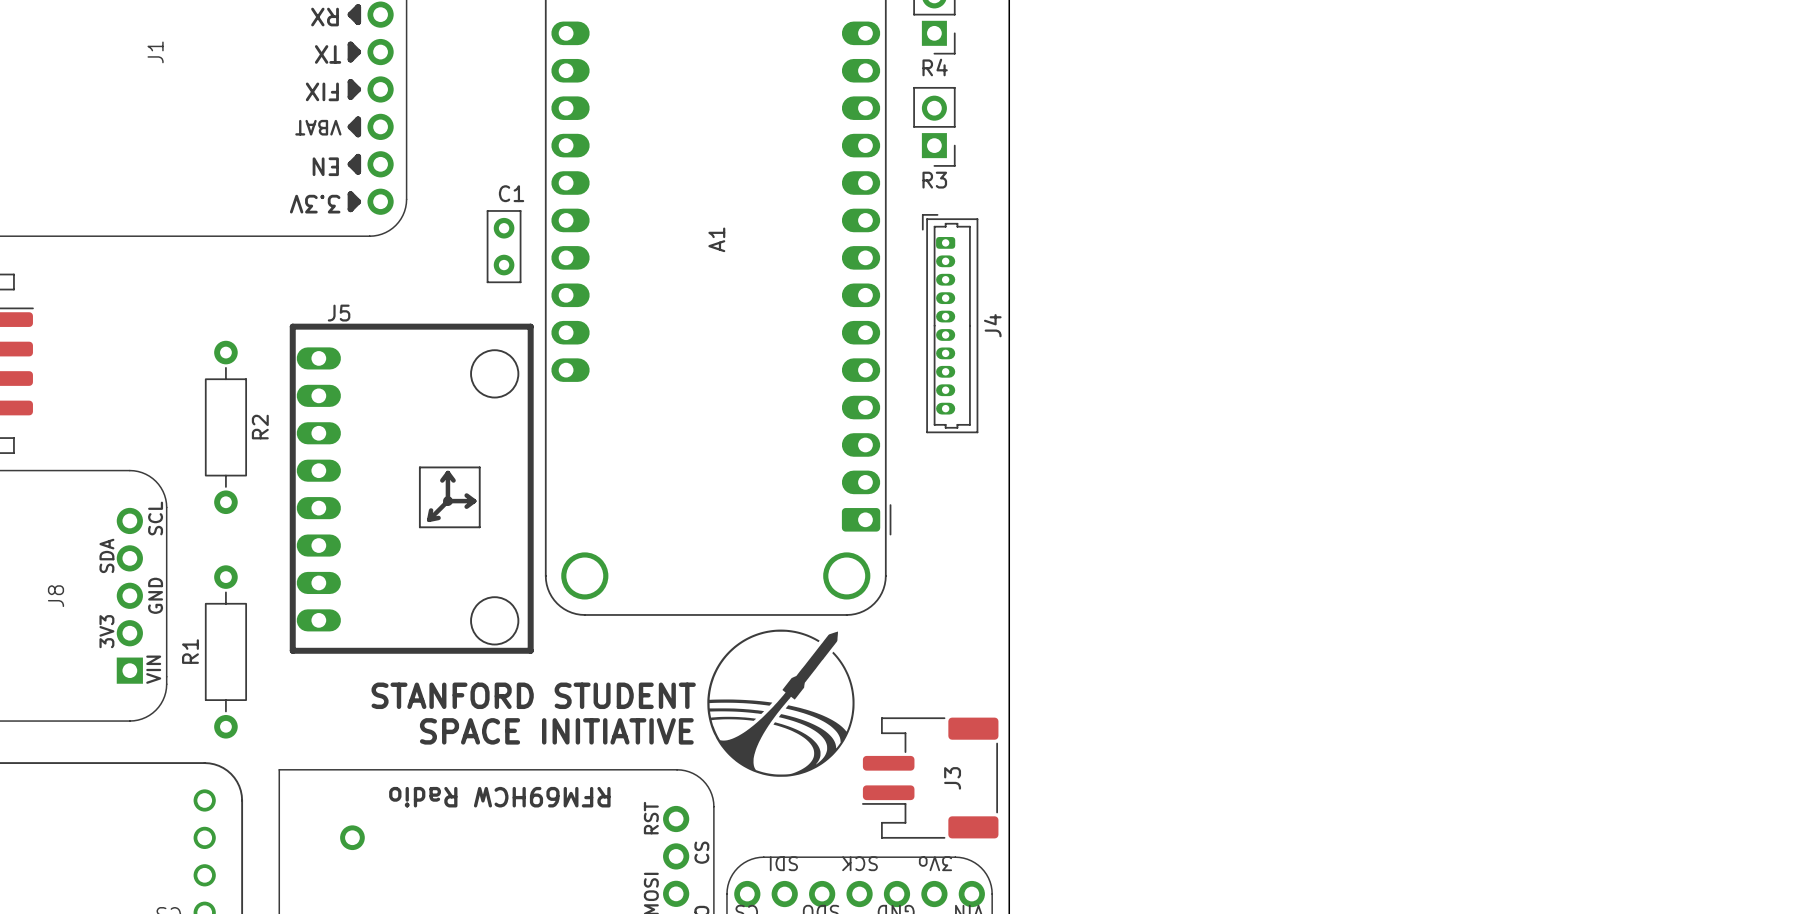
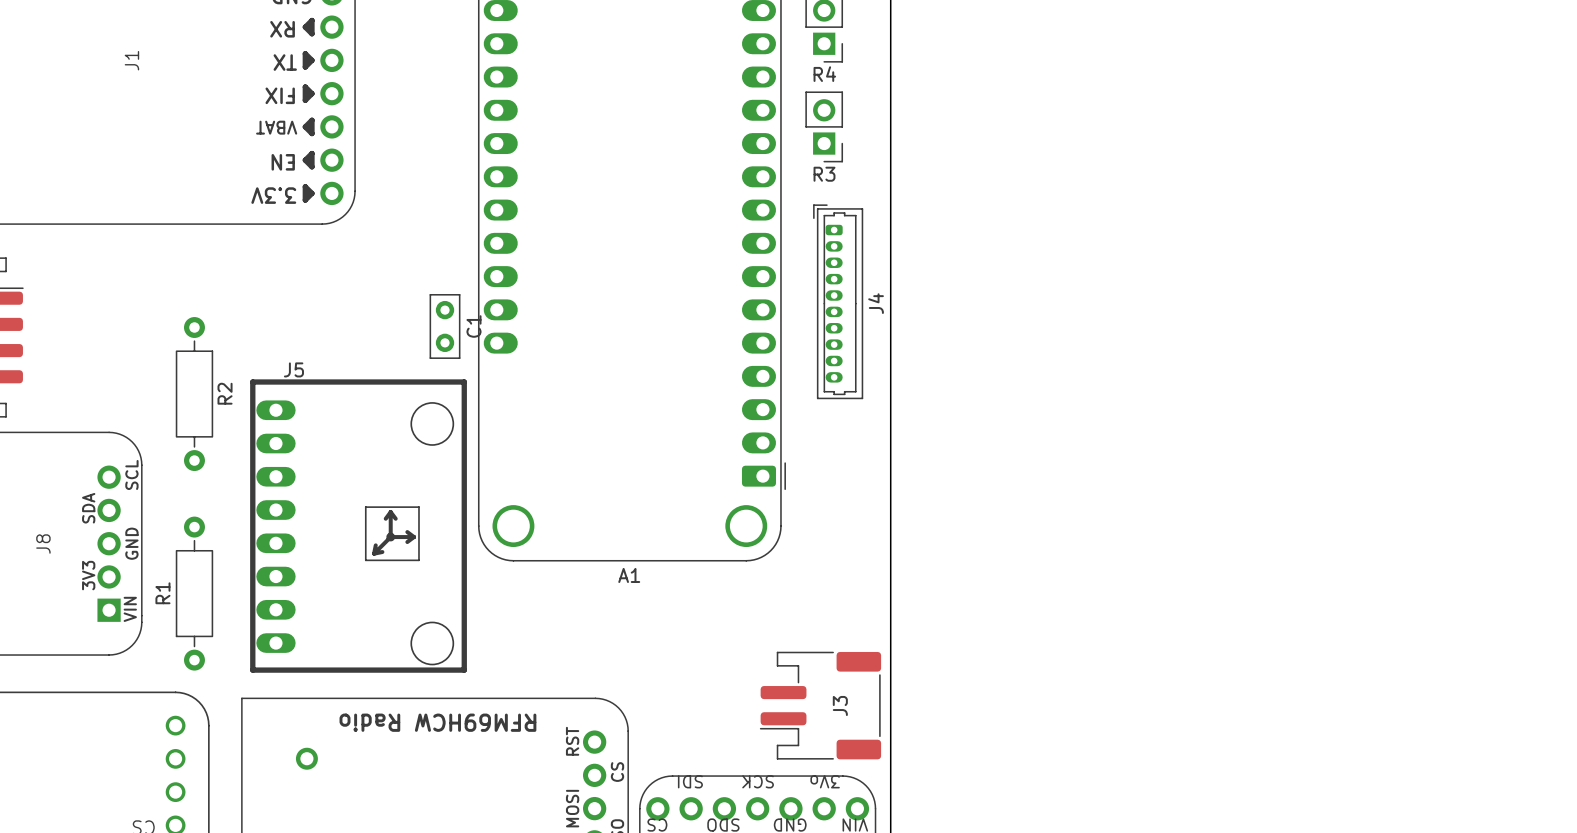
C1 name rotation: 0° (511, 193) -> 90° counterclockwise (473, 326)
C1 name position: C1 (511, 193) -> C1 (473, 326)
A1 name rotation: 0° (716, 239) -> 90° clockwise (629, 575)
A1 name position: A1 (716, 239) -> A1 (629, 575)
C1 position: (504, 246) -> (445, 326)
J5 position: (411, 488) -> (358, 526)
drawing: [707, 629, 855, 777] -> none
text: STANFORD STUDENT (533, 695) -> none
text: SPACE INITIATIVE (556, 731) -> none

